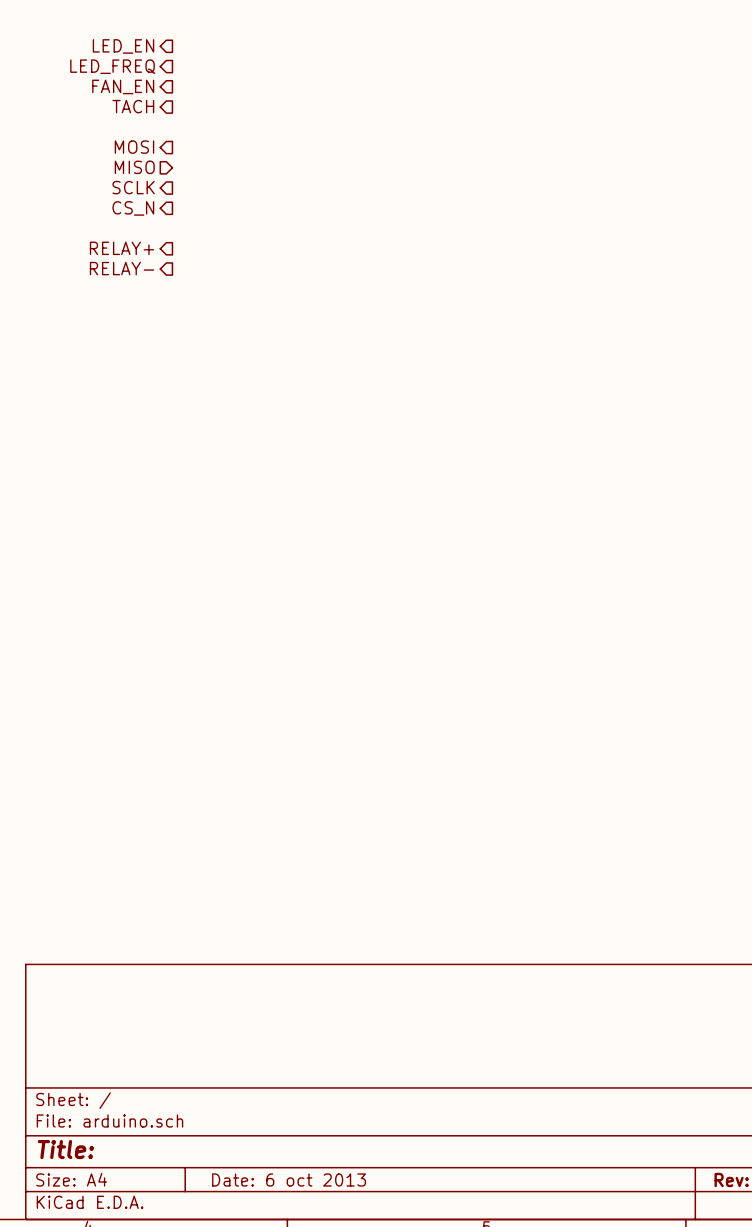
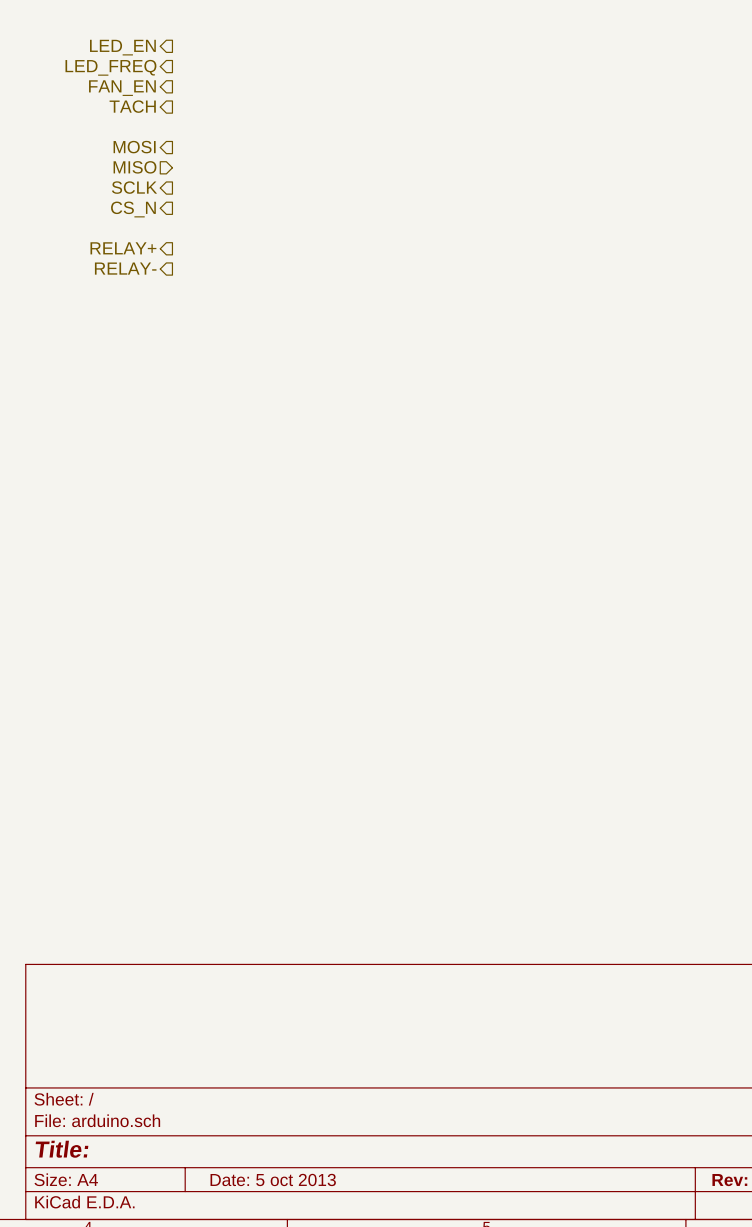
title block: Date: 6 oct 2013 (289, 1179) -> Date: 5 oct 2013 (273, 1179)

